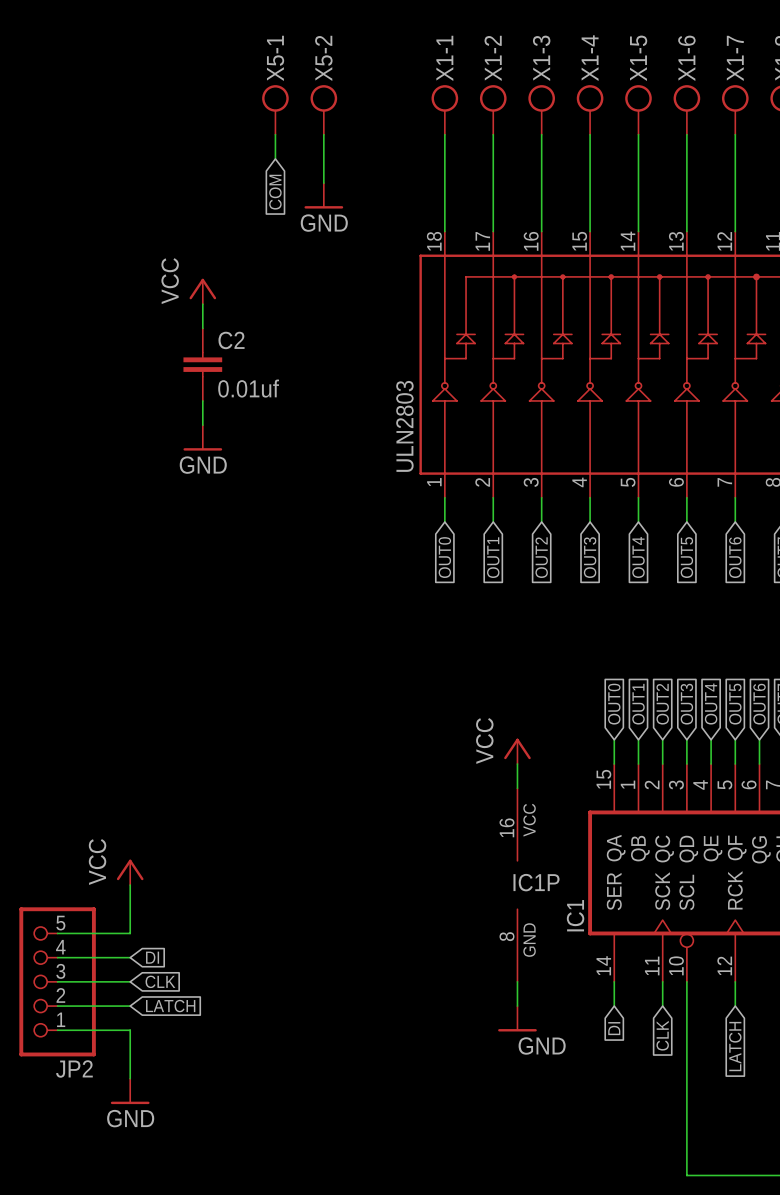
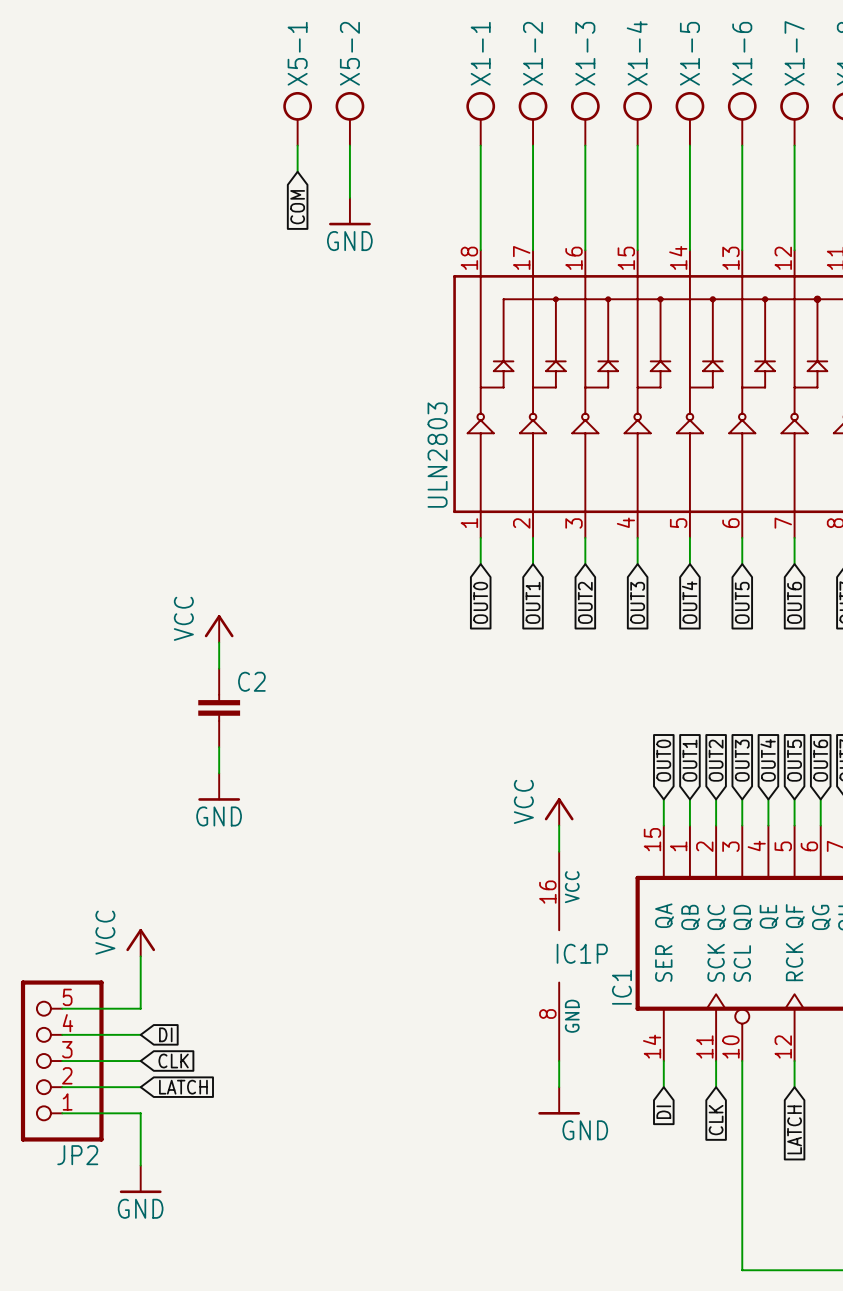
power symbol: VCC (202, 291) -> none
wire: (202, 304) (202, 328) -> none
C2 position: (202, 364) -> (219, 707)
C2 value: 0.01uf (248, 388) -> none
wire: (202, 400) (202, 425) -> (219, 642) (219, 668)
power symbol: GND (202, 437) -> none
power symbol: none -> VCC (219, 628)
wire: none -> (219, 747) (219, 773)
power symbol: none -> GND (219, 787)

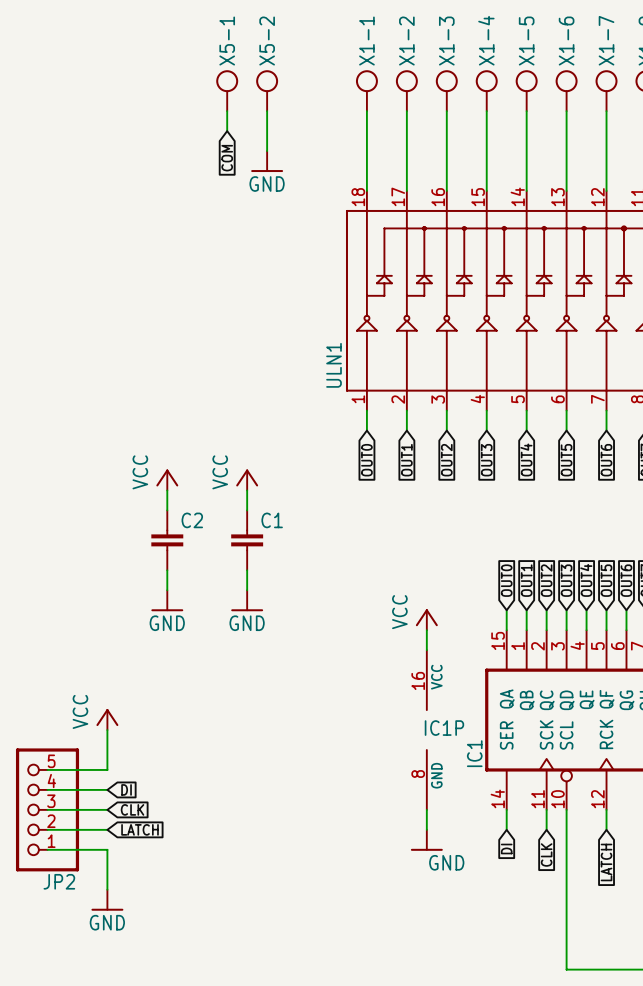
ULN2803 name: ULN2803 (437, 455) -> ULN1 (334, 365)
power symbol: none -> VCC (247, 479)
wire: none -> (247, 490) (247, 510)
C1: none -> (247, 540)
wire: none -> (247, 570) (247, 590)
power symbol: none -> GND (247, 600)

